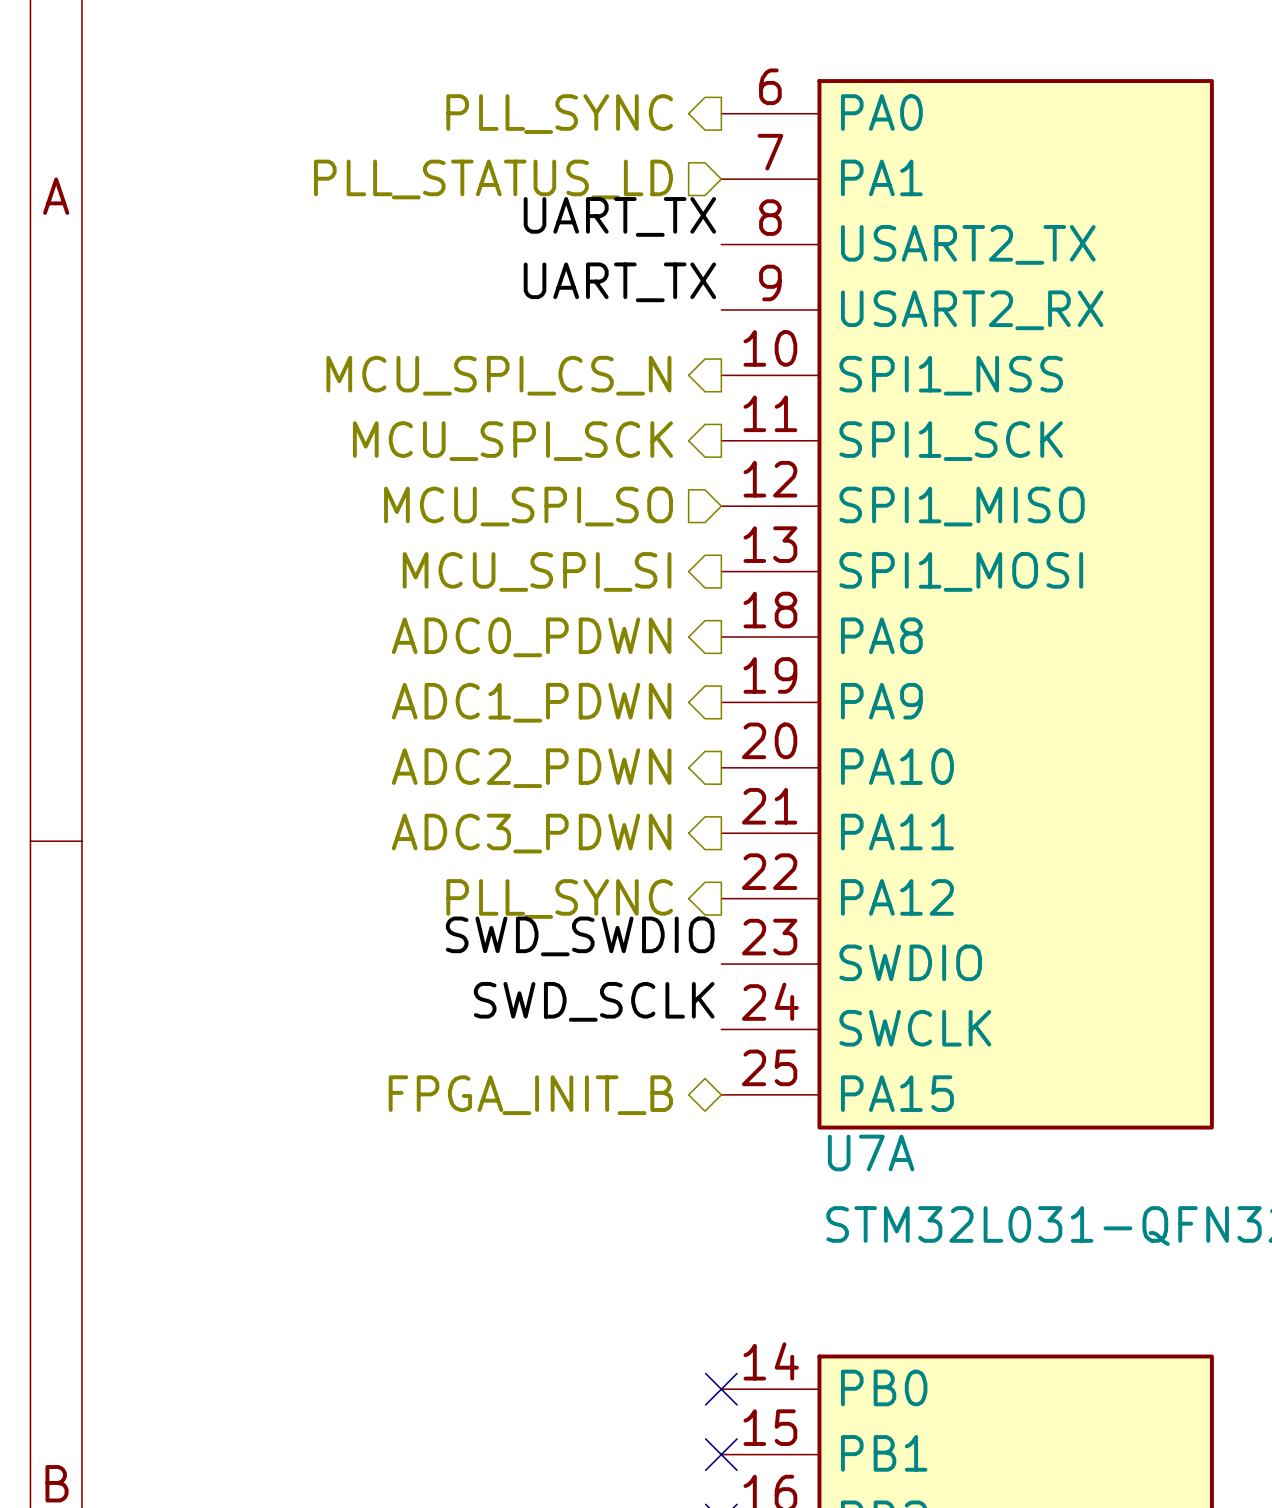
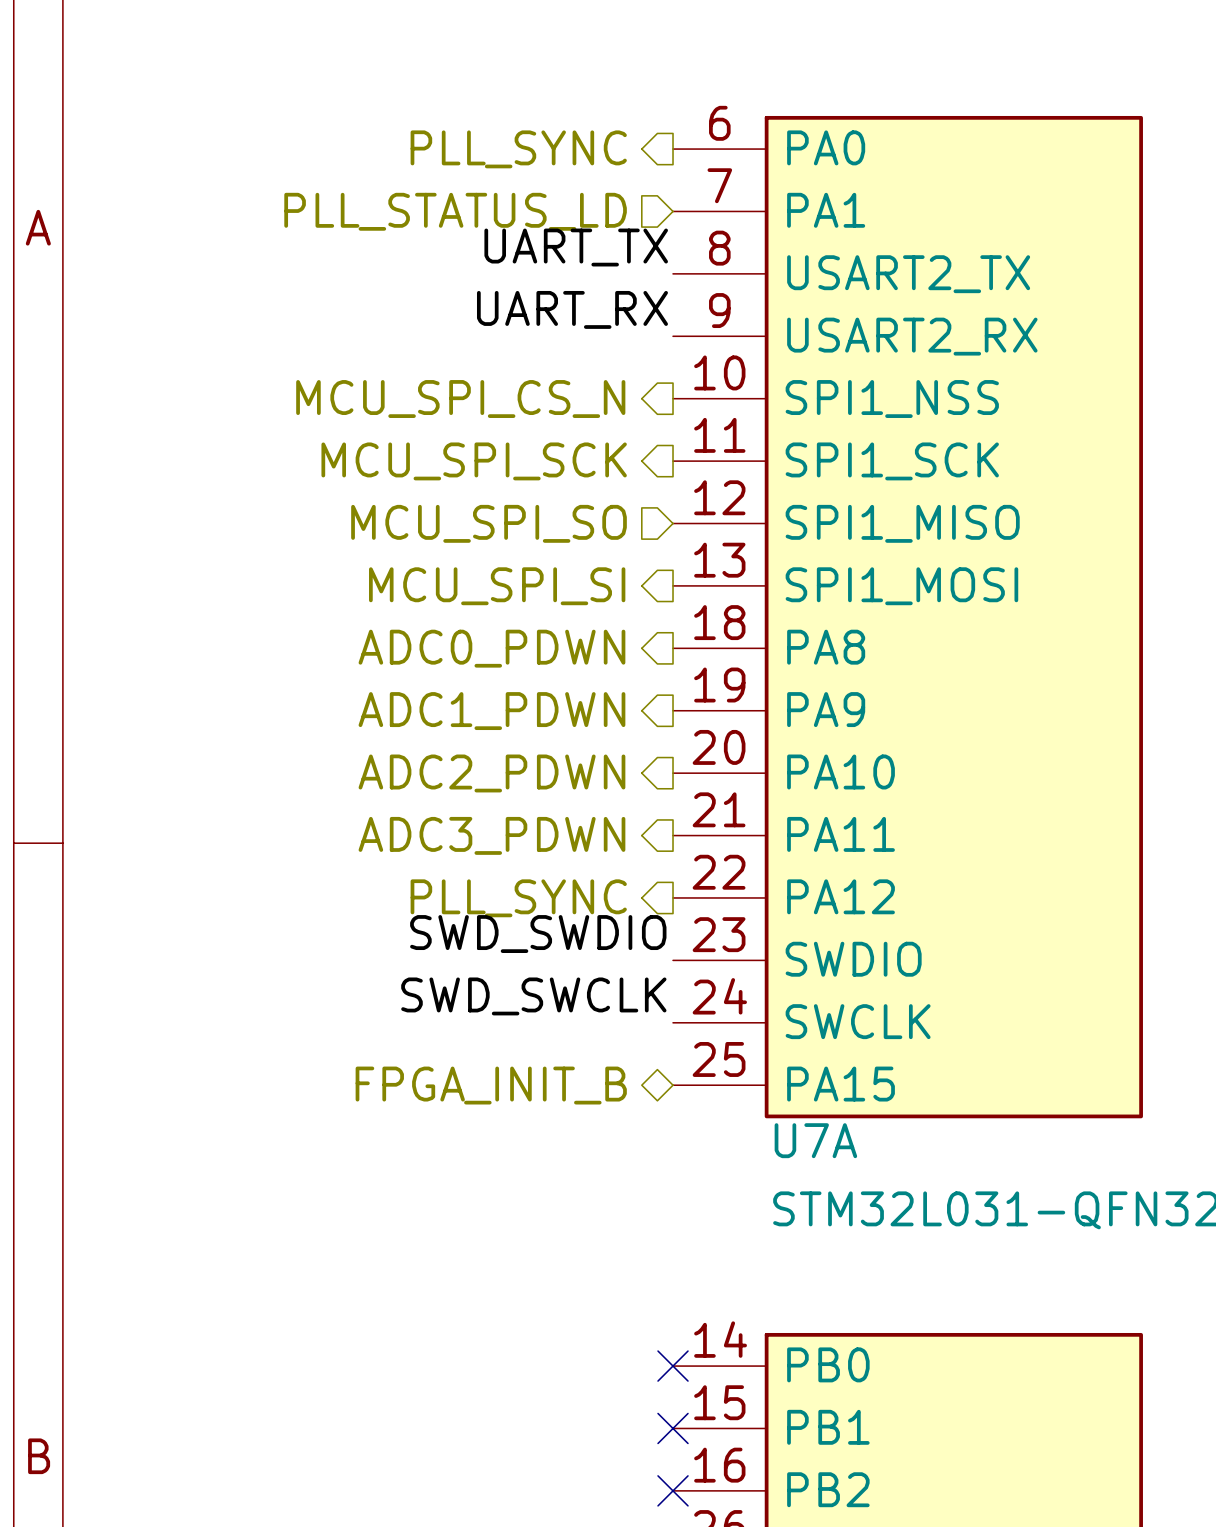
label: UART_TX (619, 282) -> UART_RX (572, 309)
label: SWD_SCLK (594, 1001) -> SWD_SWCLK (533, 996)

